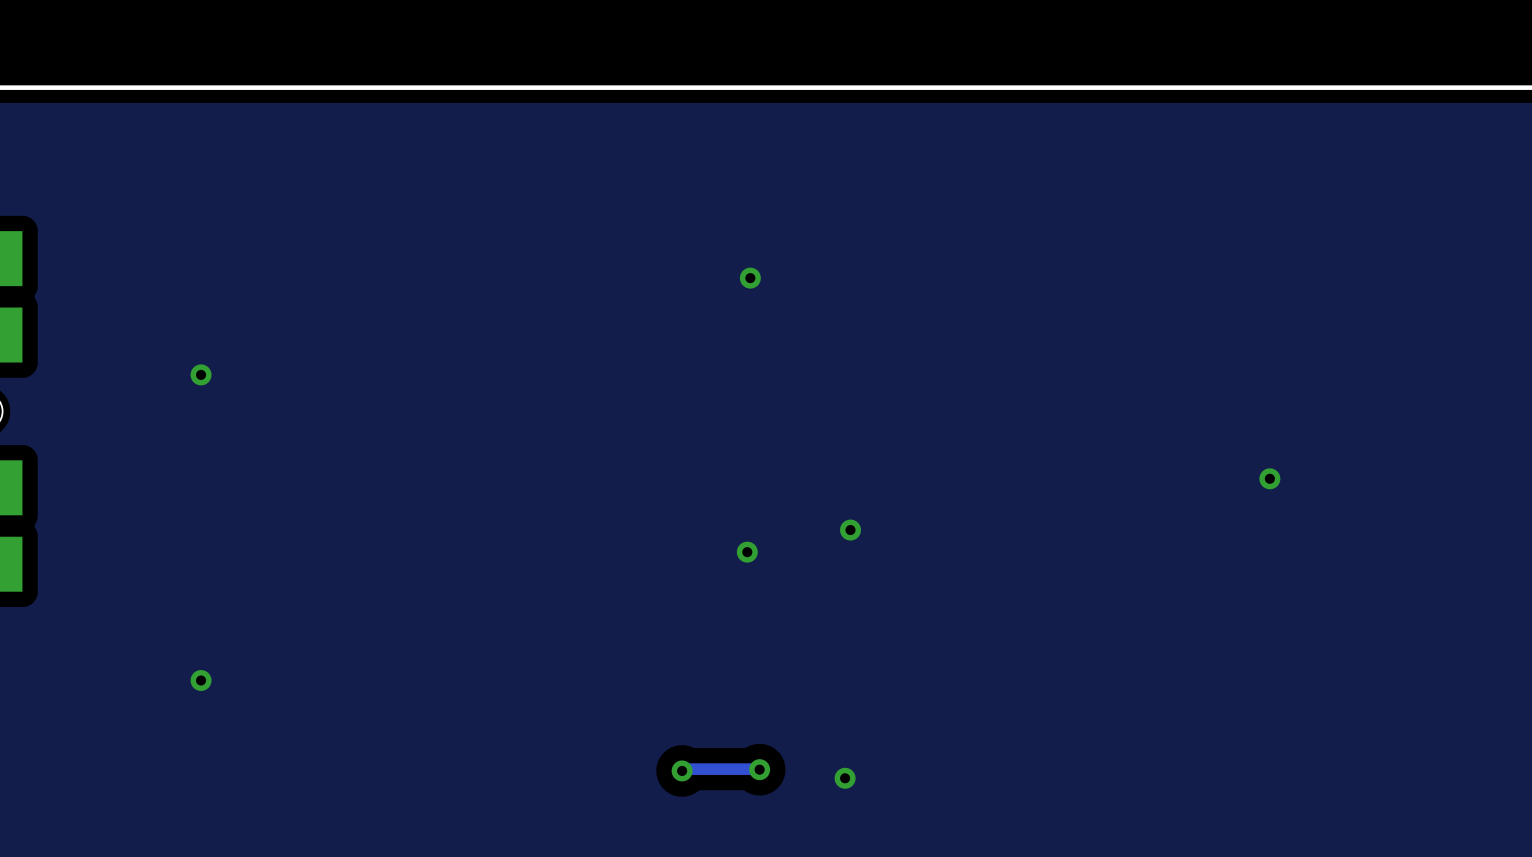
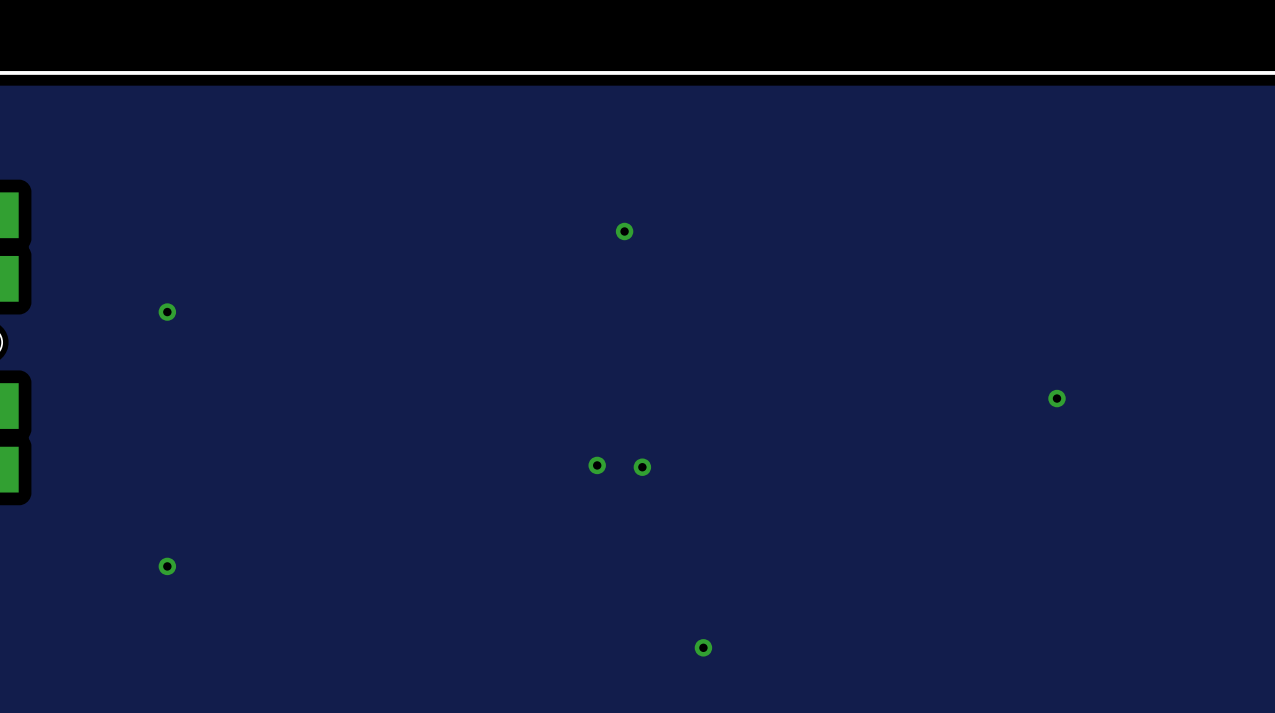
via: (850, 530) -> none
via: (747, 552) -> none
via: none -> (597, 465)
via: none -> (642, 467)
track: (759, 769) (683, 769) (682, 770) -> none
via: (759, 769) -> none
via: (682, 770) -> none

